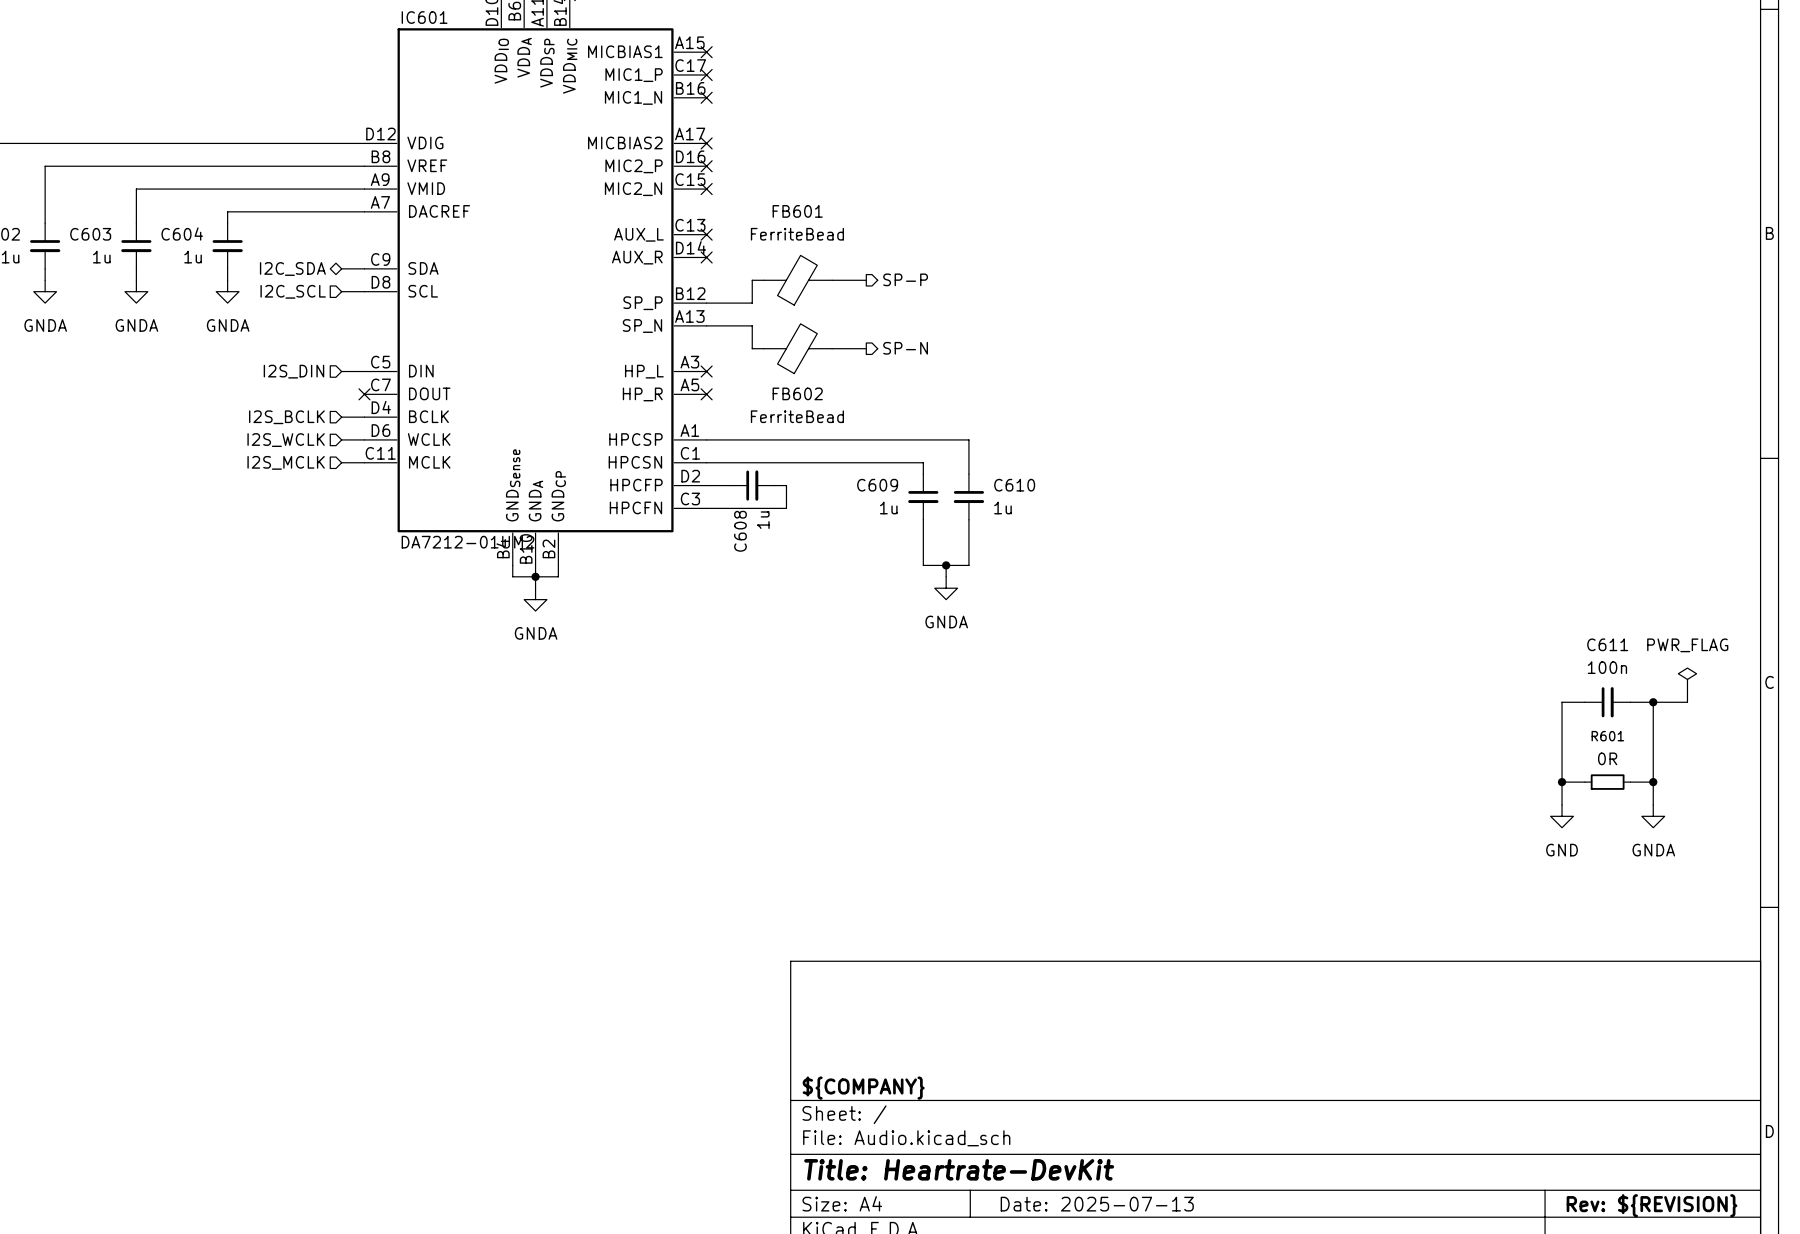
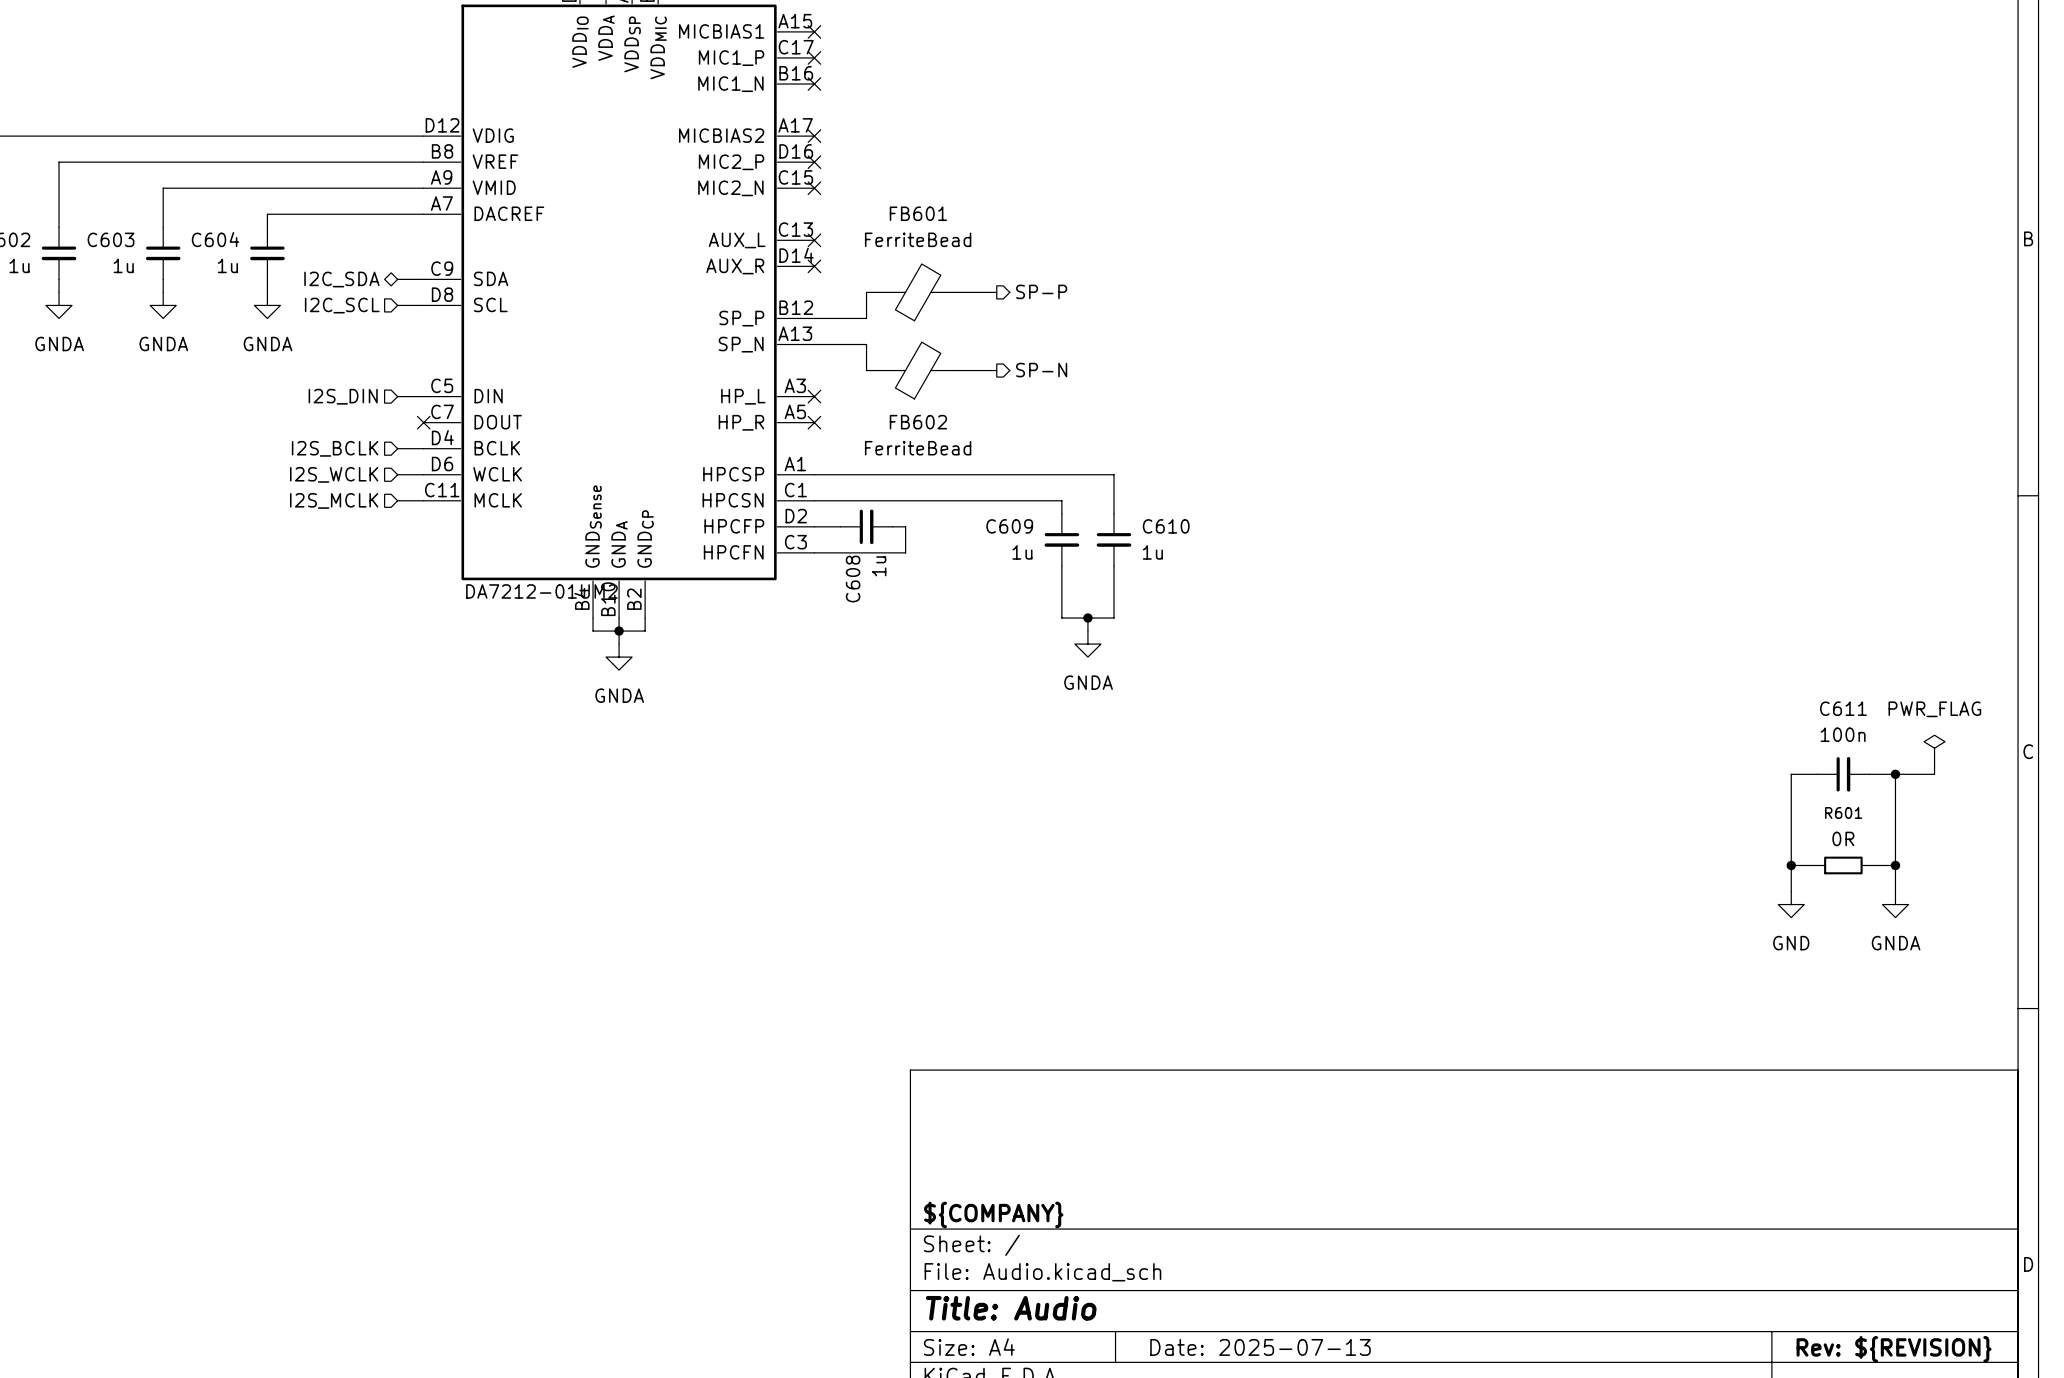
title block: Title: Heartrate-DevKit (959, 1169) -> Title: Audio (1011, 1308)

